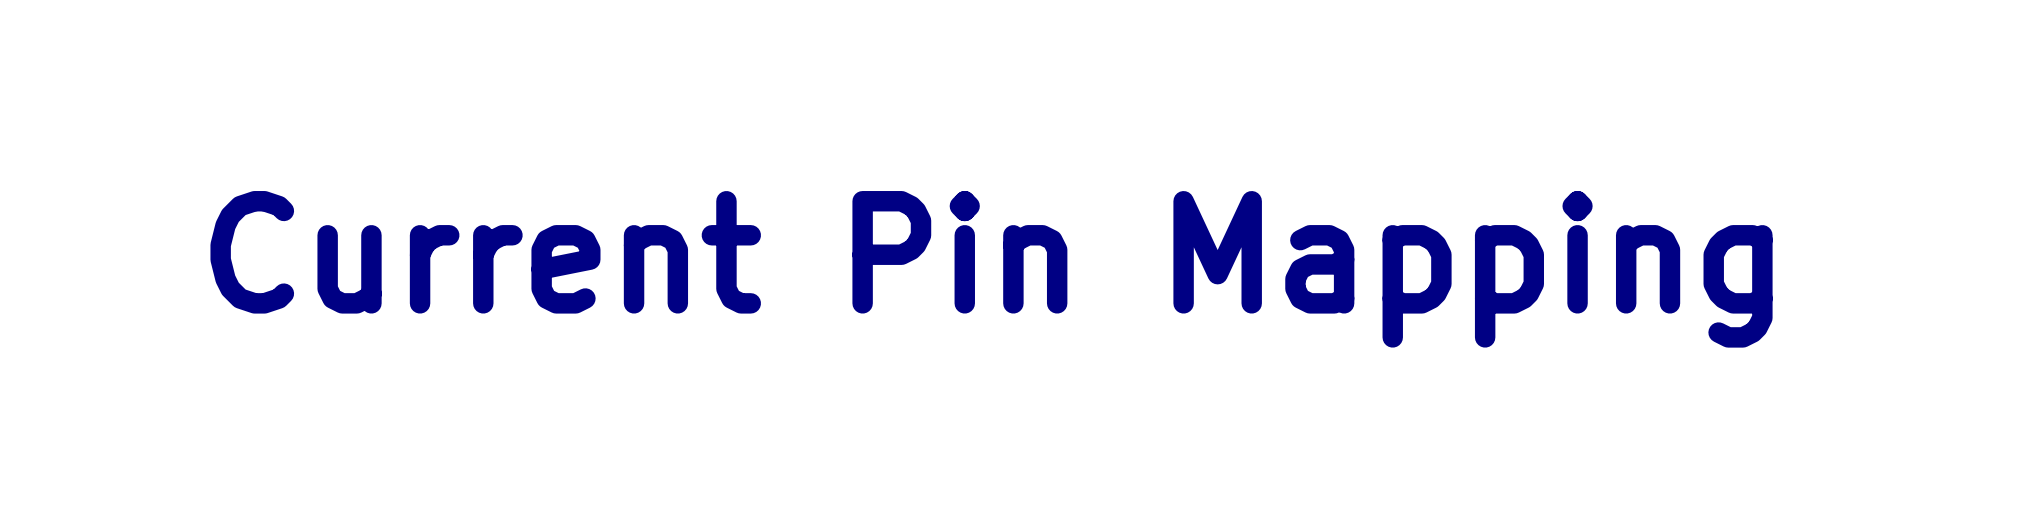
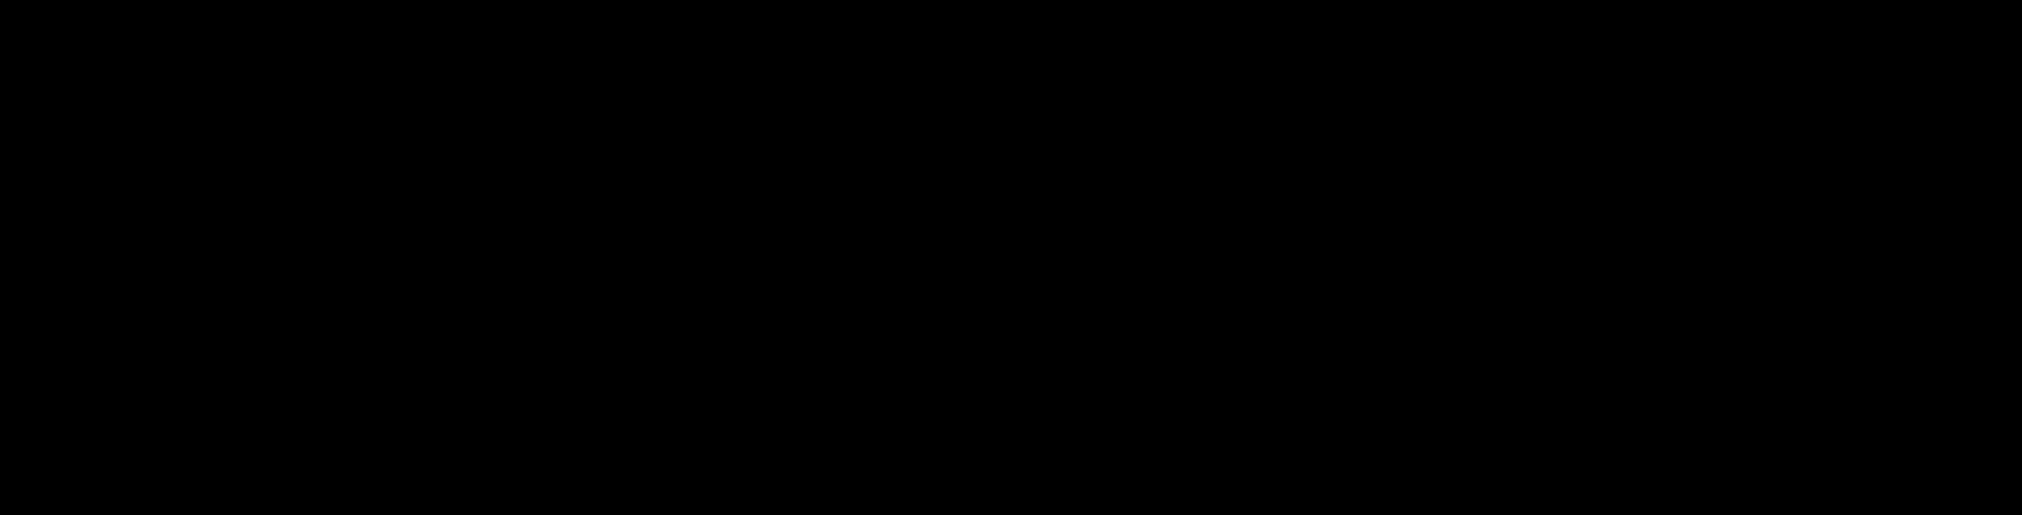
text: Current Pin Mapping (991, 269) -> none

